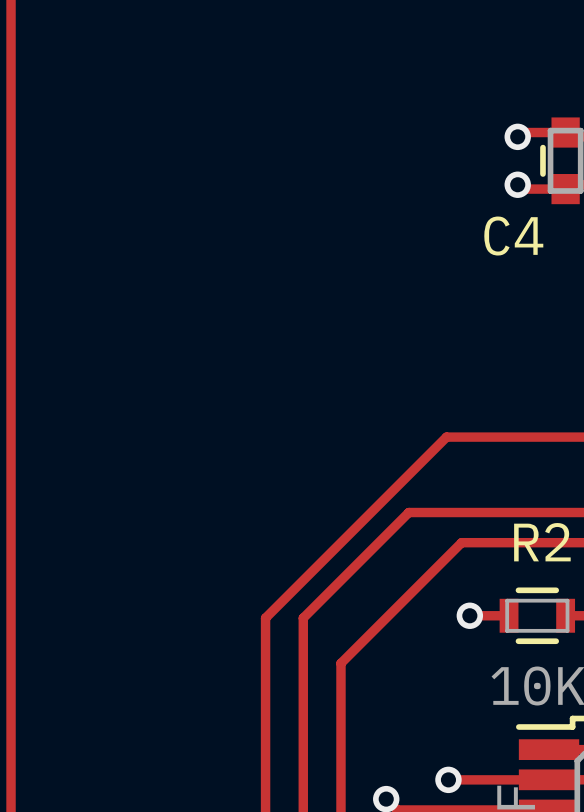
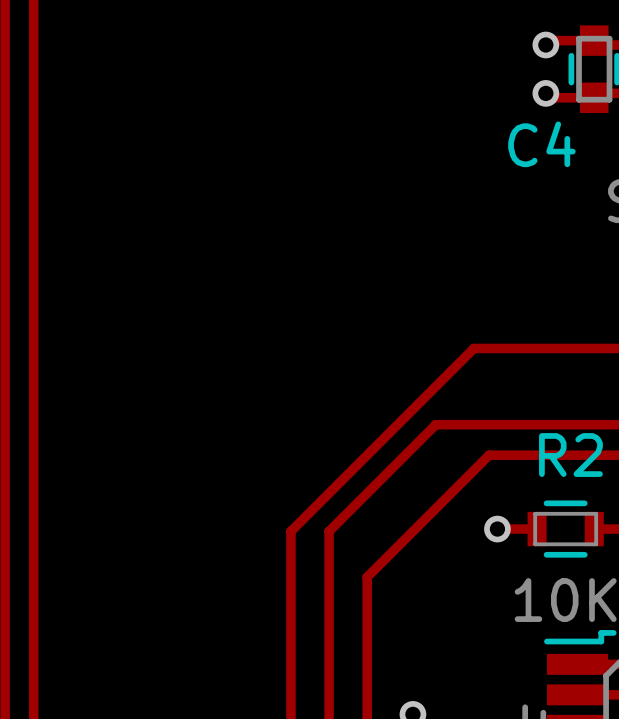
via: (448, 779) -> none

